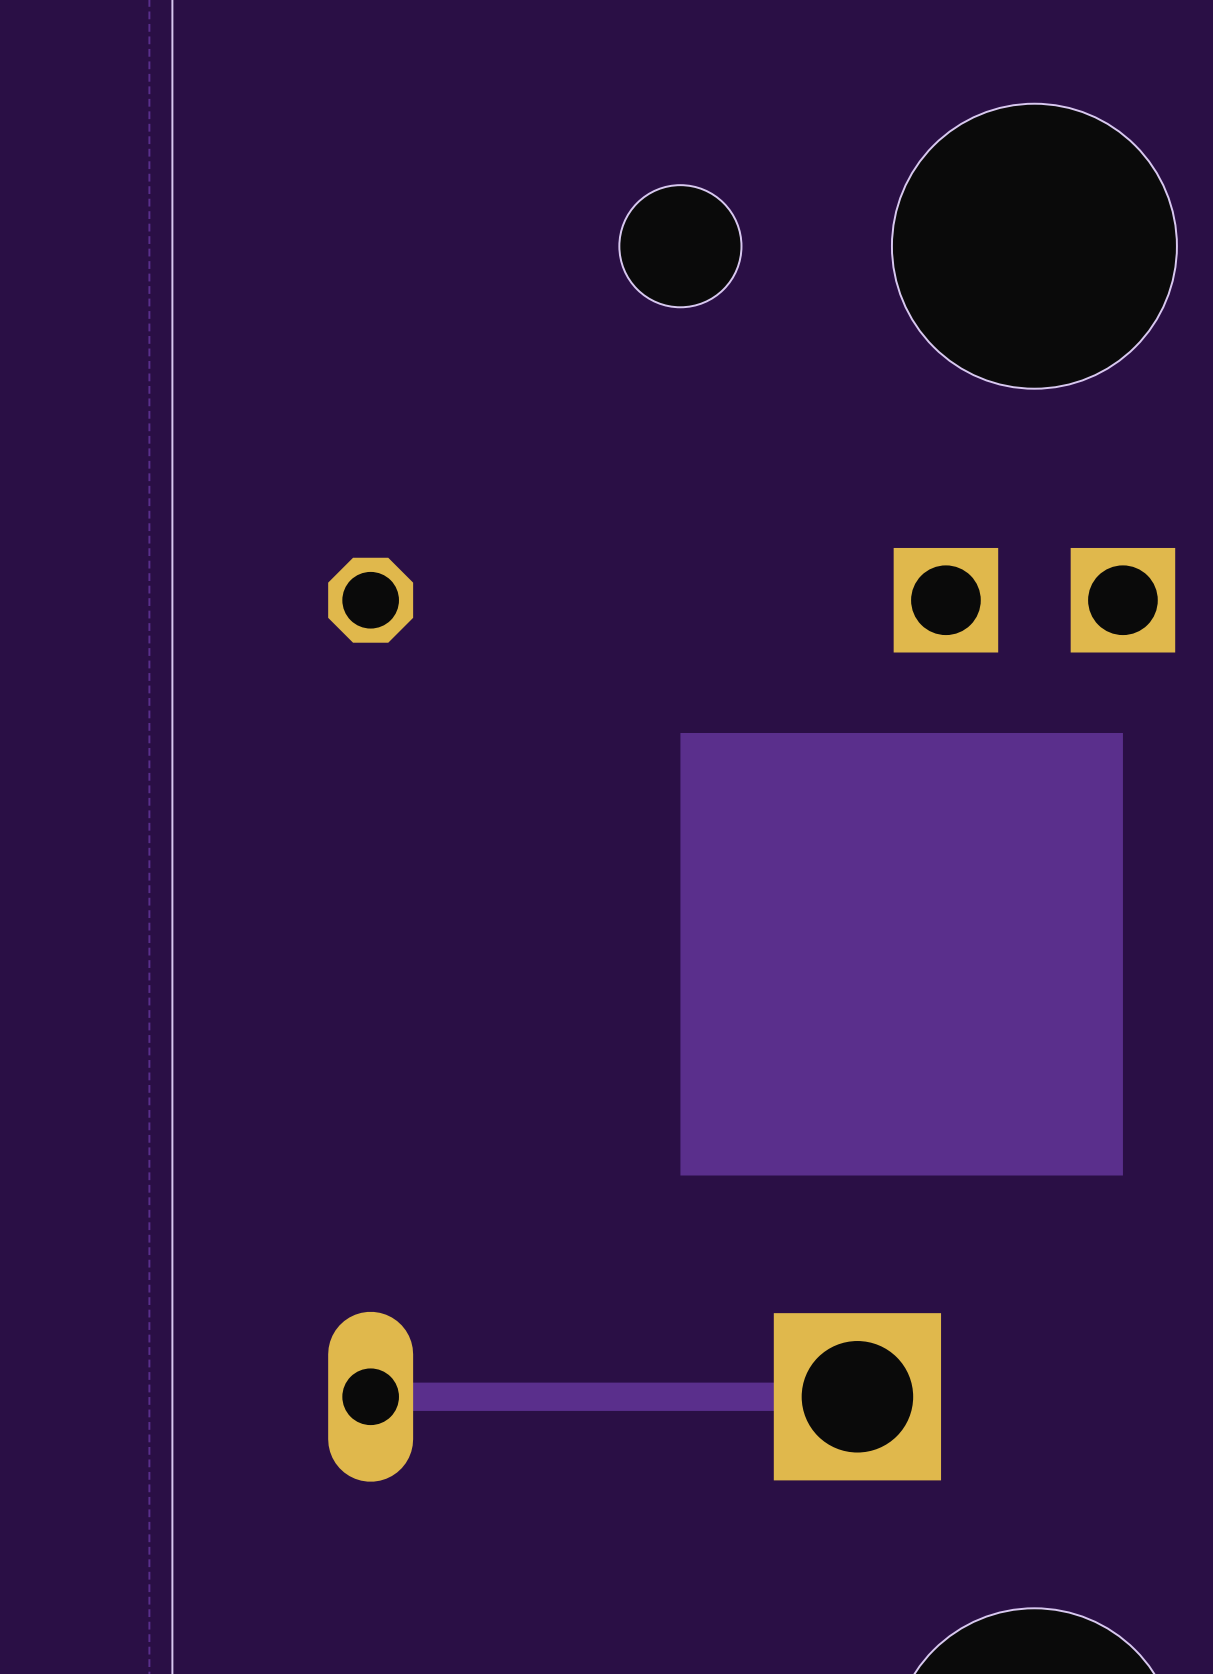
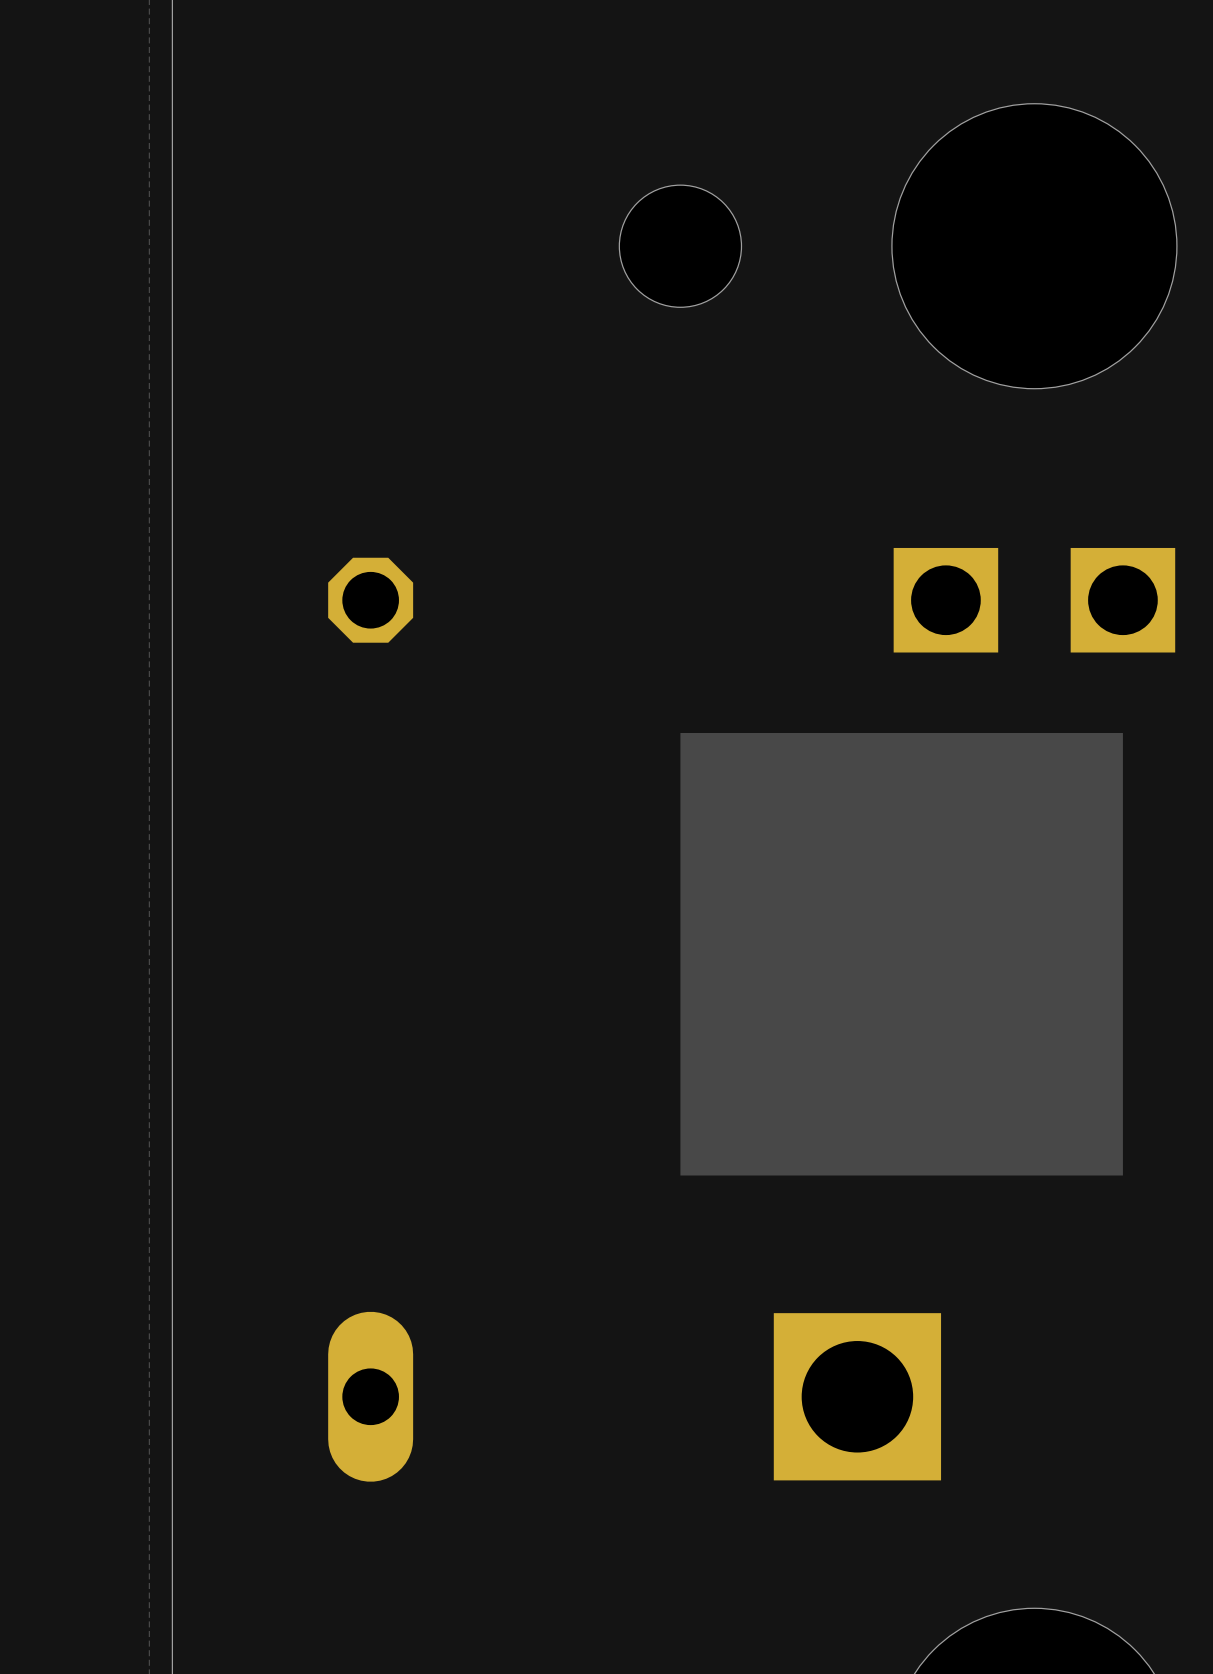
track: (857, 1396) (370, 1396) -> none

